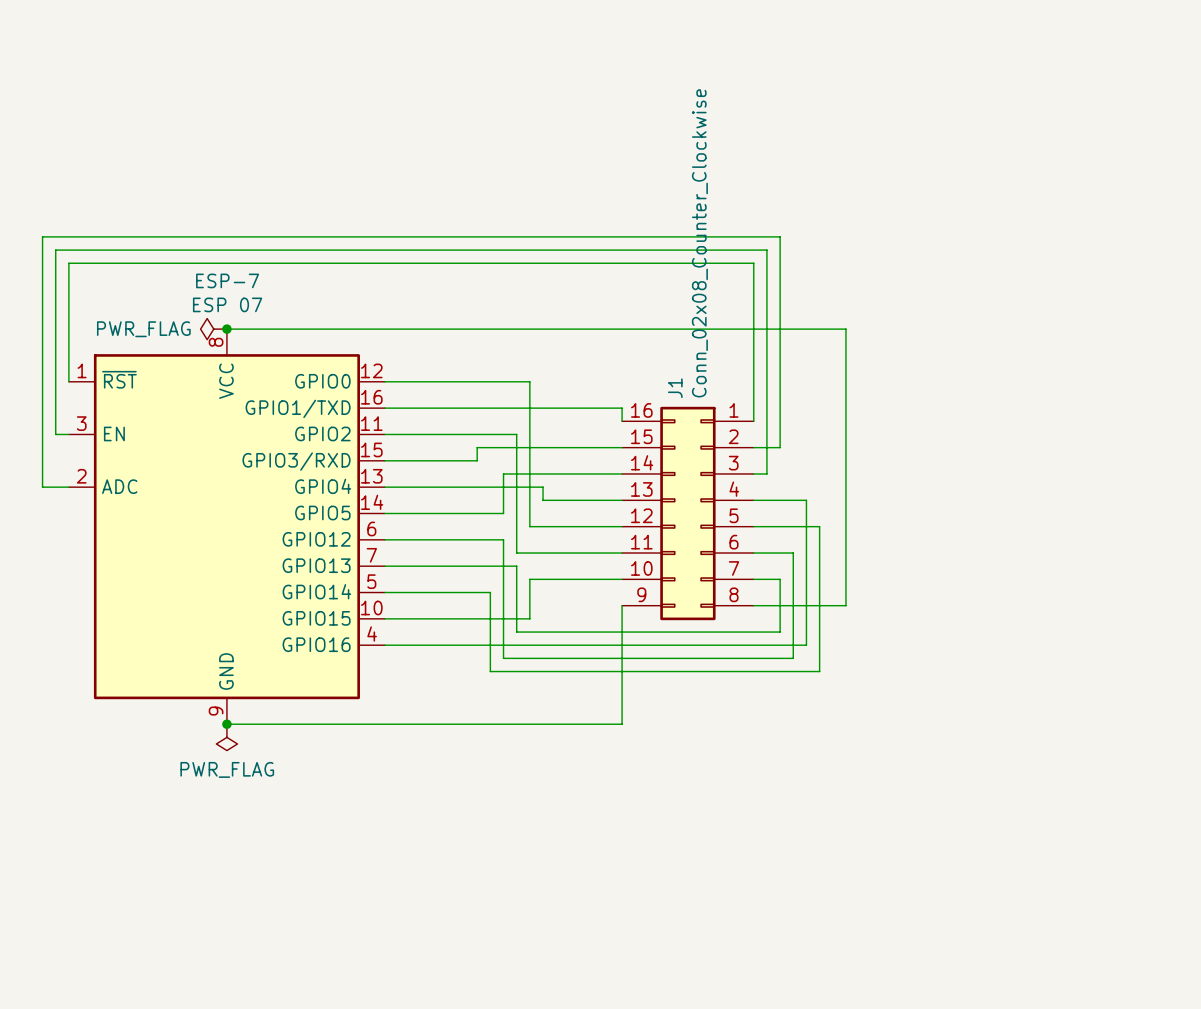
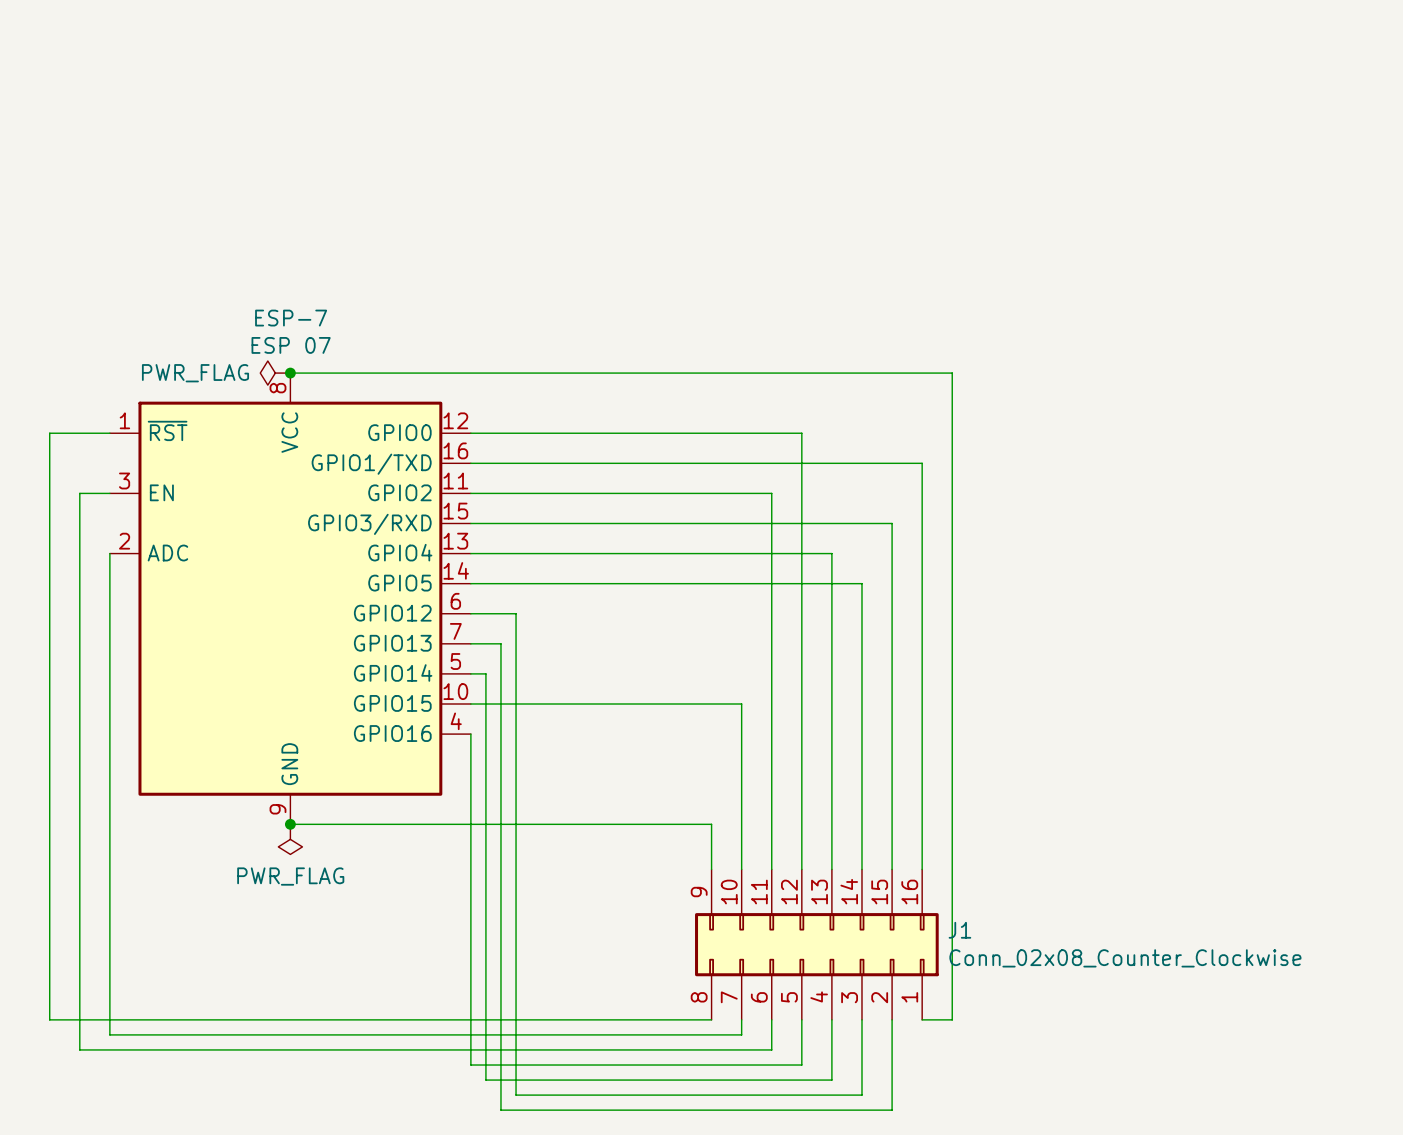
wire: (806, 329) (845, 329) (845, 605) (753, 605) -> (952, 373) (952, 568)
wire: (68, 381) (68, 263) (753, 263) (753, 421) -> (109, 433) (49, 433) (49, 1019) (711, 1019)
wire: (529, 381) (529, 526) (622, 526) -> (636, 433) (801, 433) (801, 869)
wire: (622, 408) (622, 421) -> (741, 463) (922, 463)
wire: (780, 408) (780, 236) (42, 236) (42, 434) -> none
wire: (55, 434) (55, 250) (766, 250) (766, 473) (753, 473) -> (94, 493) (79, 493)
wire: (516, 434) (516, 553) (622, 553) -> (621, 493) (771, 493) (771, 869)
wire: (622, 447) (477, 447) (477, 460) -> (892, 869) (892, 523) (576, 523)
wire: (753, 447) (780, 447) -> (922, 658) (922, 508)
wire: (622, 473) (503, 473) (503, 513) -> (861, 869) (861, 583) (606, 583)
wire: (42, 487) (68, 487) -> (79, 553) (79, 1049) (771, 1049) (771, 1019)
wire: none -> (109, 553) (109, 1034) (741, 1034) (741, 1019)
wire: (543, 487) (543, 500) (622, 500) -> (651, 553) (831, 553) (831, 869)
wire: (753, 500) (806, 500) -> none
J1 rotation: 0° (687, 513) -> 90° clockwise (816, 944)
J1 position: (687, 513) -> (816, 944)
wire: (753, 526) (819, 526) (819, 671) (490, 671) (490, 592) (398, 592) -> (831, 1019) (831, 1080) (485, 1080) (485, 673)
wire: (424, 539) (503, 539) (503, 658) (793, 658) (793, 553) (753, 553) -> (516, 613) (516, 1095) (861, 1095) (861, 1019)
wire: (411, 566) (516, 566) (516, 632) (780, 632) -> (500, 643) (500, 1110) (892, 1110) (892, 1019)
wire: (622, 579) (529, 579) (529, 618) -> (741, 704) (636, 704)
wire: (753, 579) (780, 579) -> none
wire: (622, 605) (622, 618) -> none
wire: none -> (922, 719) (922, 869)
wire: (384, 645) (806, 645) -> (470, 734) (470, 1065) (801, 1065) (801, 1019)
wire: none -> (952, 734) (952, 1019) (922, 1019)
wire: (595, 724) (622, 724) -> (711, 824) (711, 869)
wire: none -> (741, 824) (741, 869)

